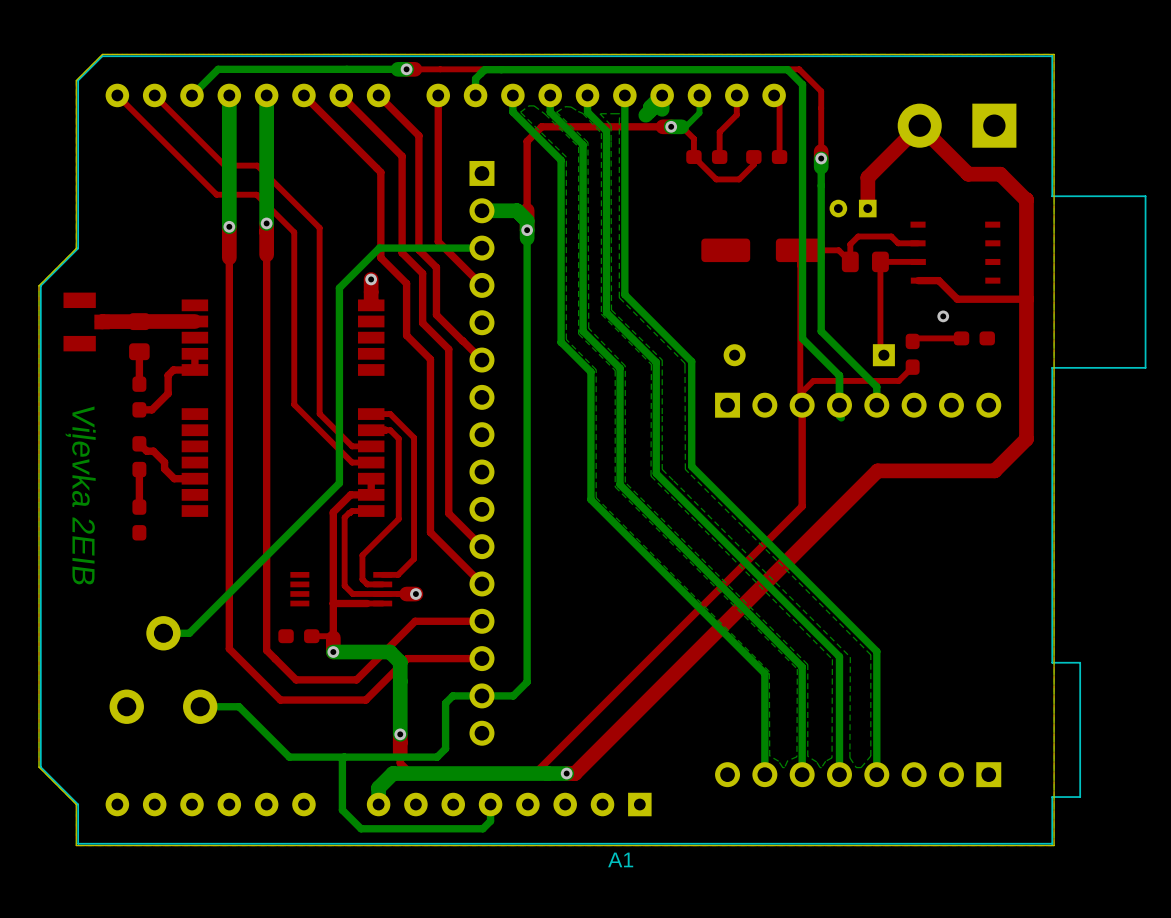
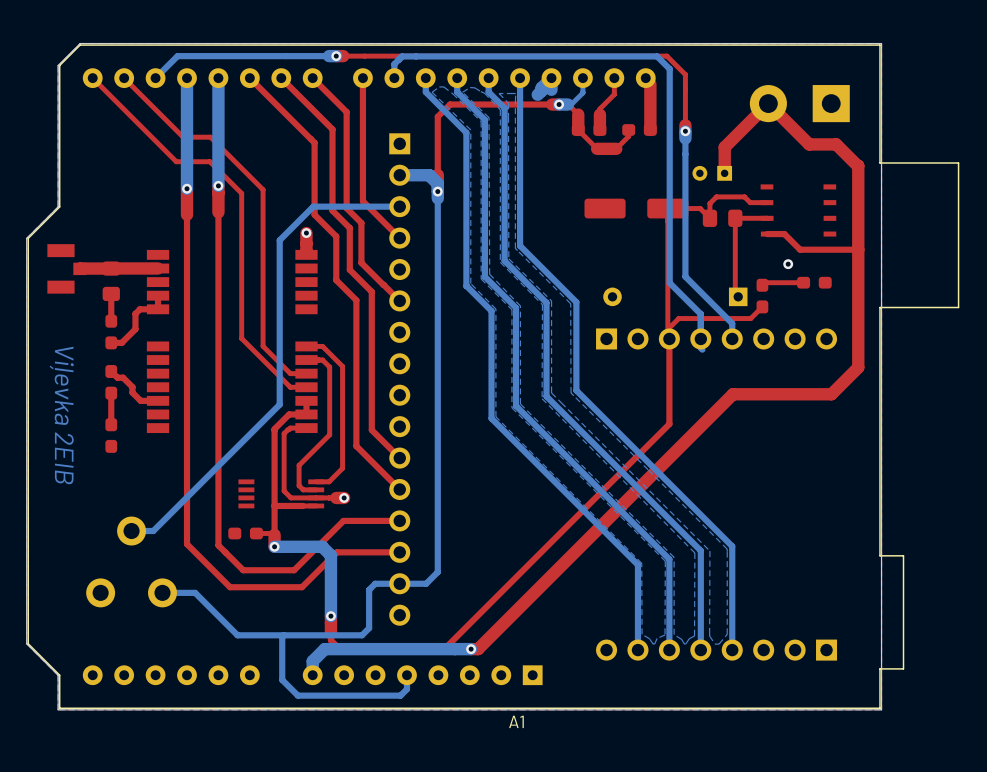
top track width: thin (779, 102) (779, 157) -> thick (650, 84) (650, 129)
top track width: thin (693, 138) (693, 157) -> thick (578, 114) (578, 129)
top track width: thin (719, 138) (719, 157) -> thick (599, 114) (599, 129)
top track width: thin (739, 179) (716, 179) -> thick (616, 148) (597, 148)

